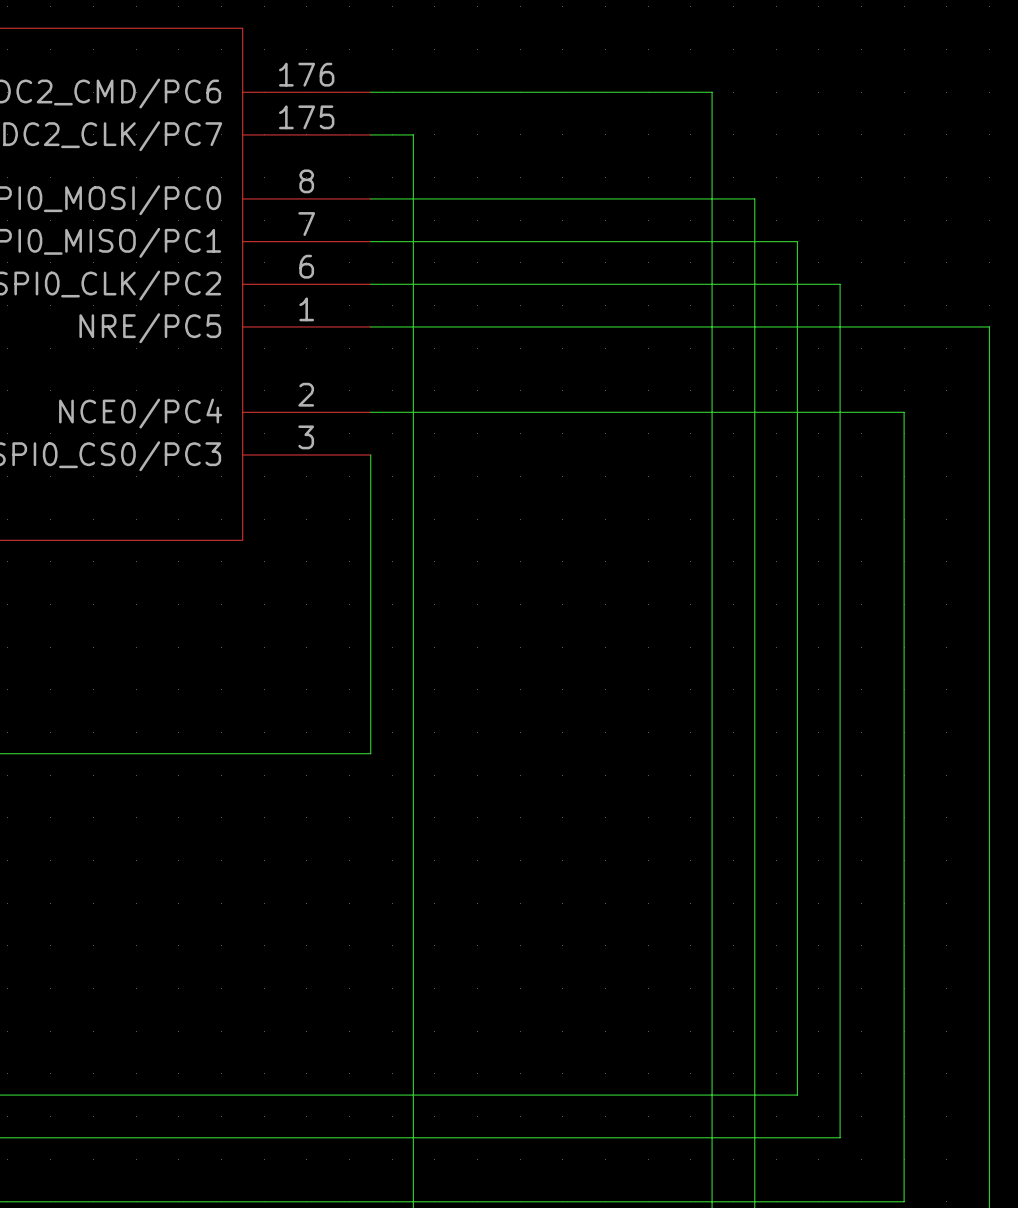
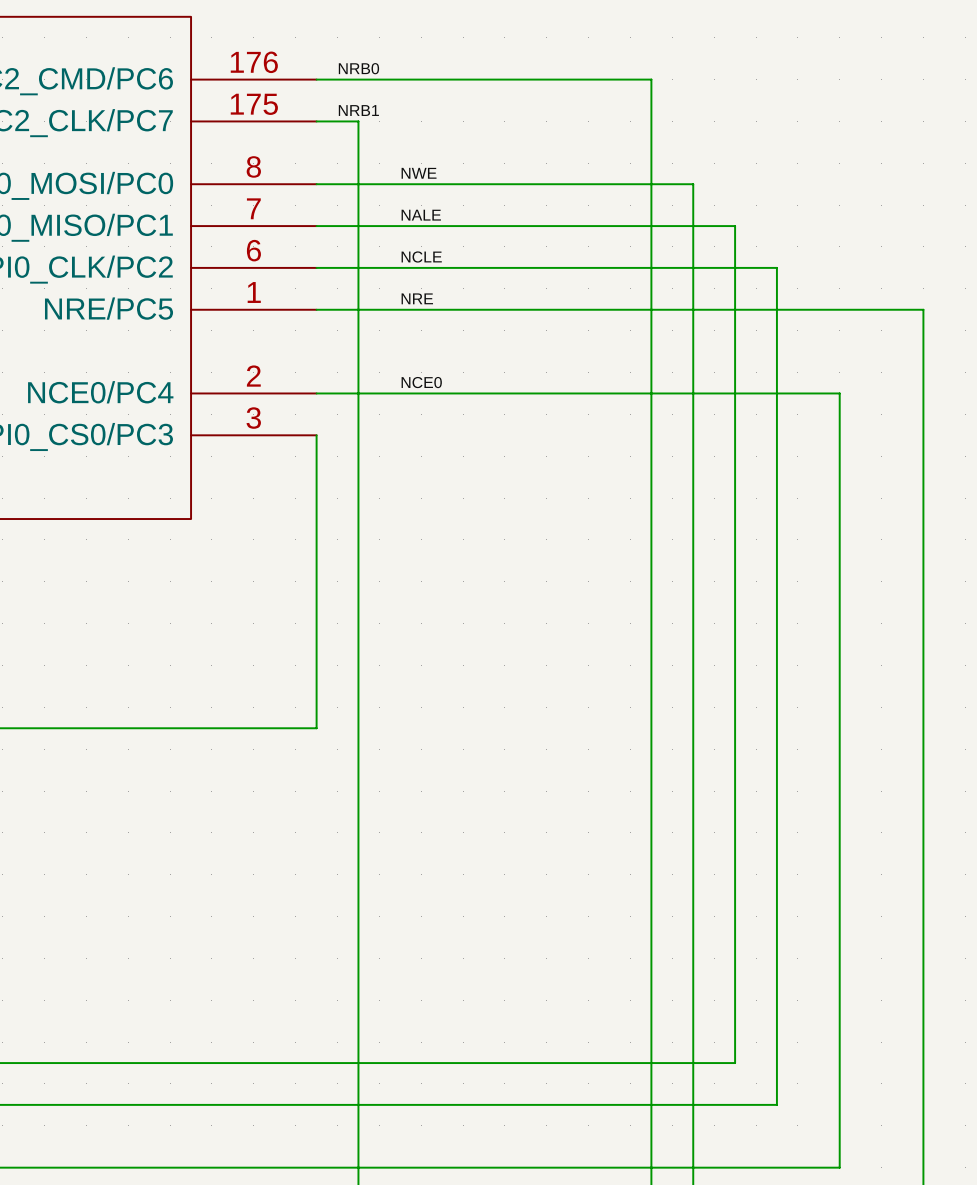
label: none -> NRB0 (358, 68)
label: none -> NRB1 (358, 110)
label: none -> NWE (419, 173)
label: none -> NALE (421, 215)
label: none -> NCLE (421, 256)
label: none -> NRE (417, 298)
label: none -> NCE0 (421, 382)

